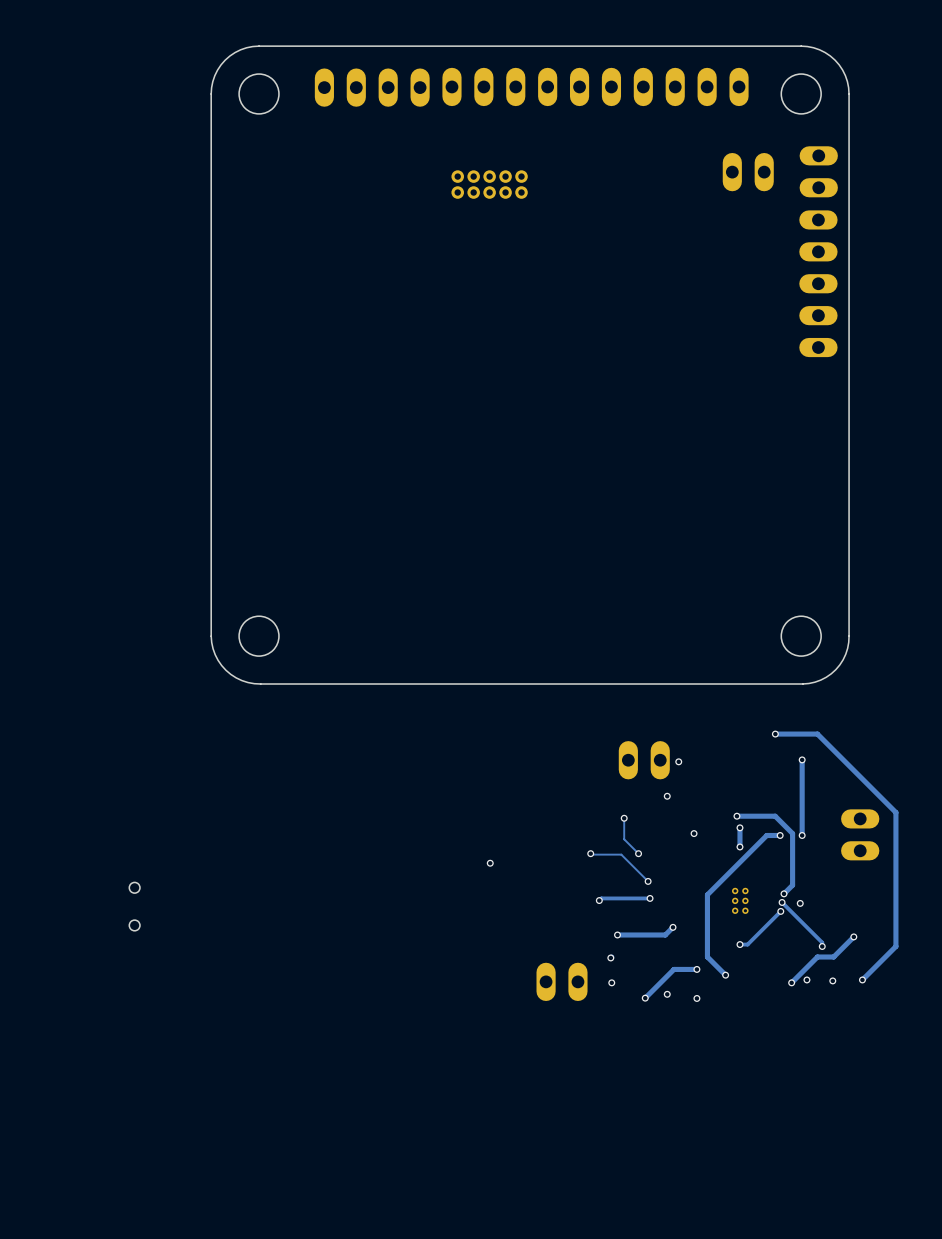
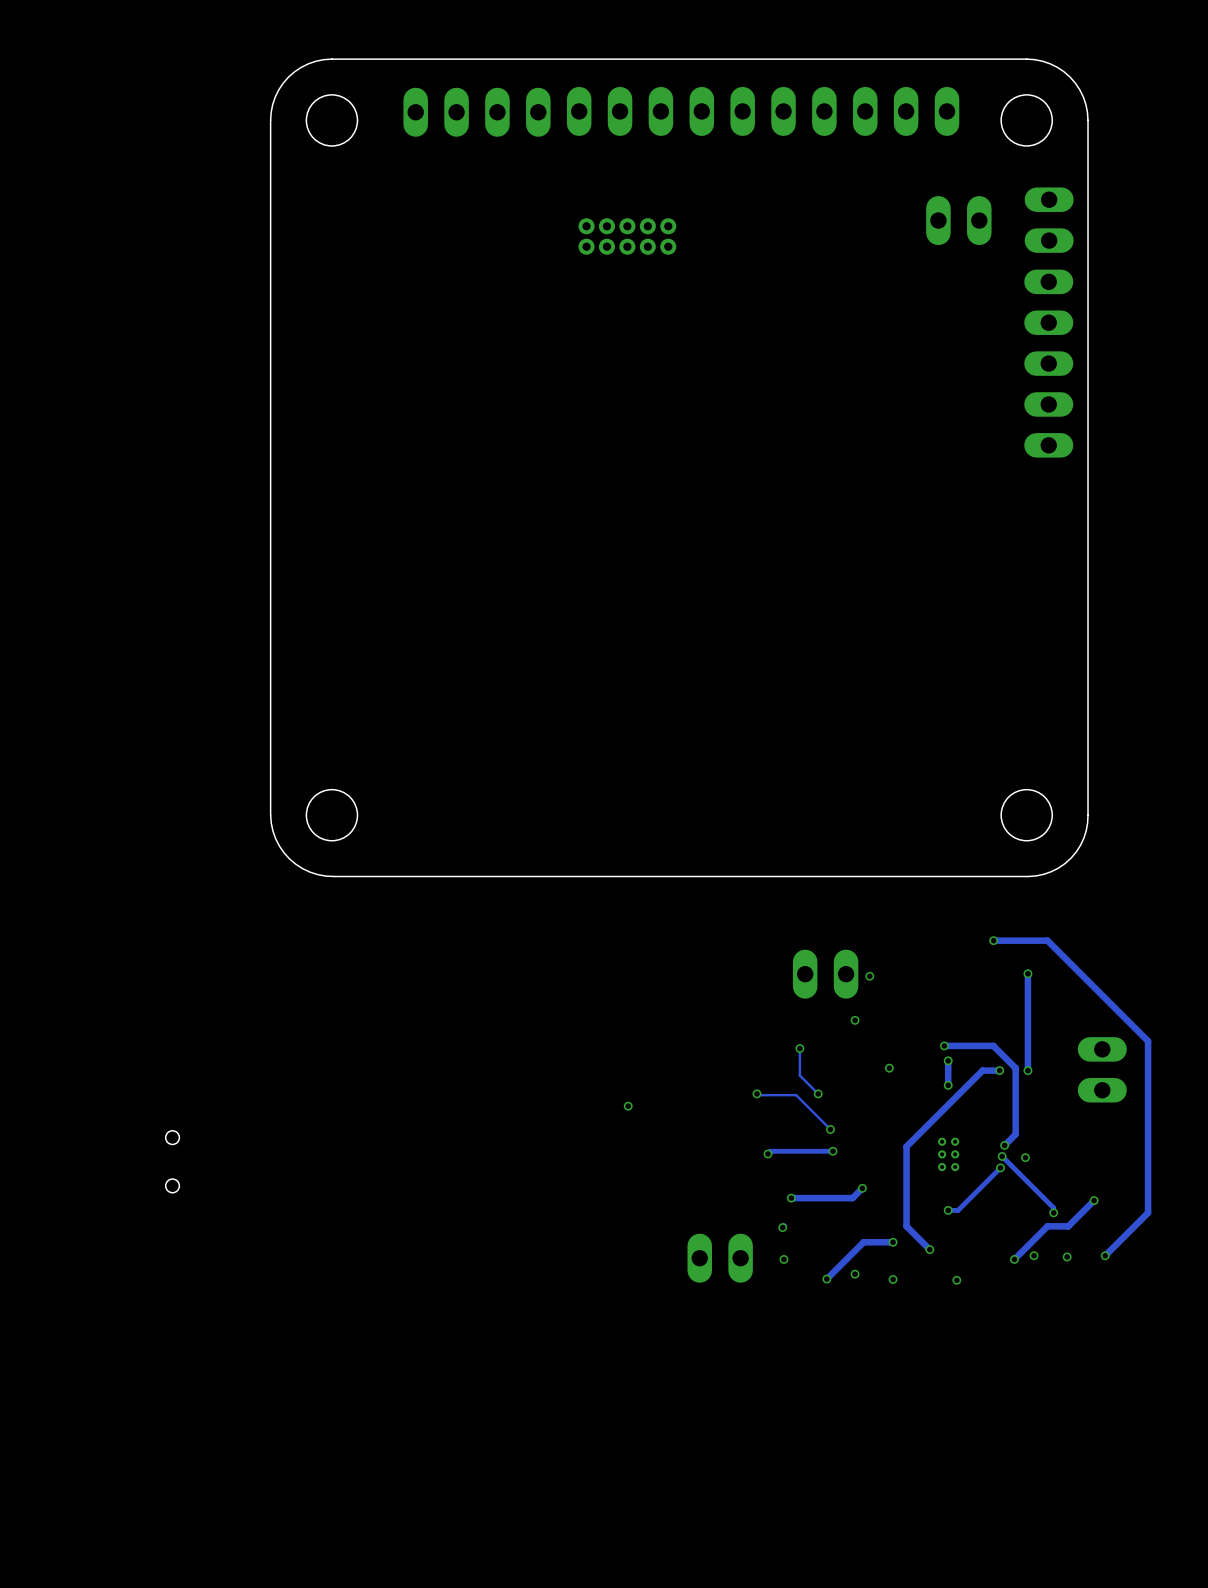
via: none -> (956, 1280)

